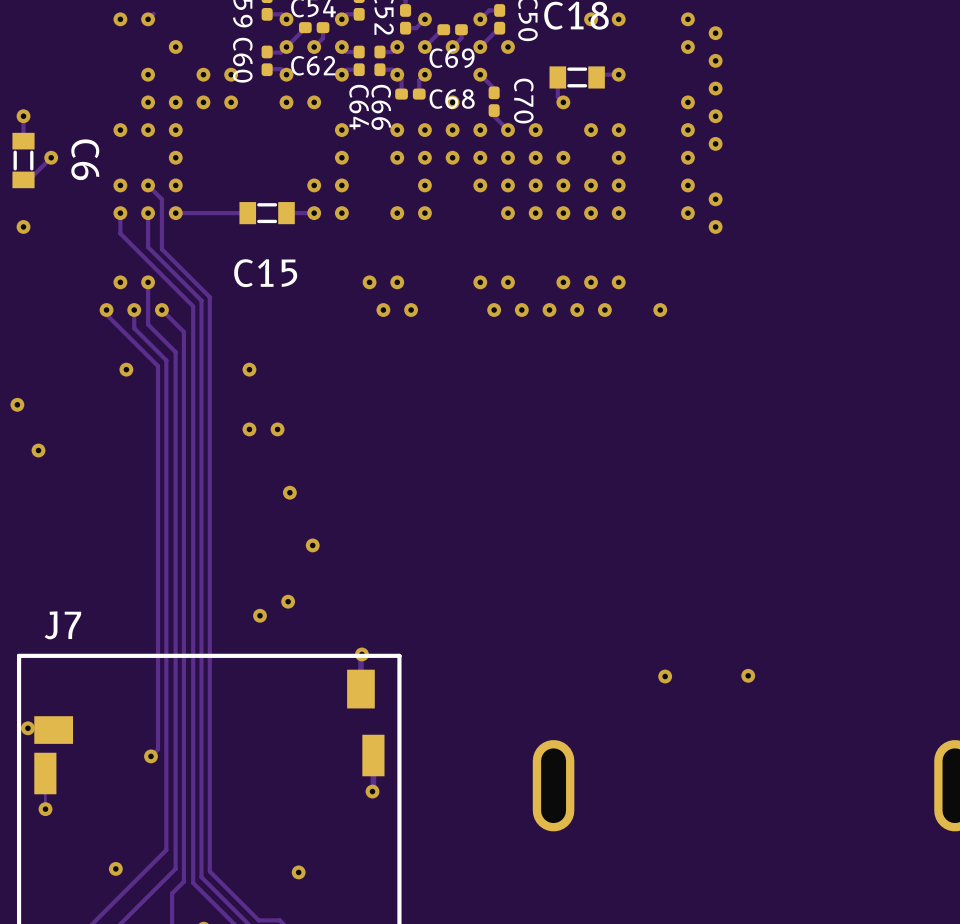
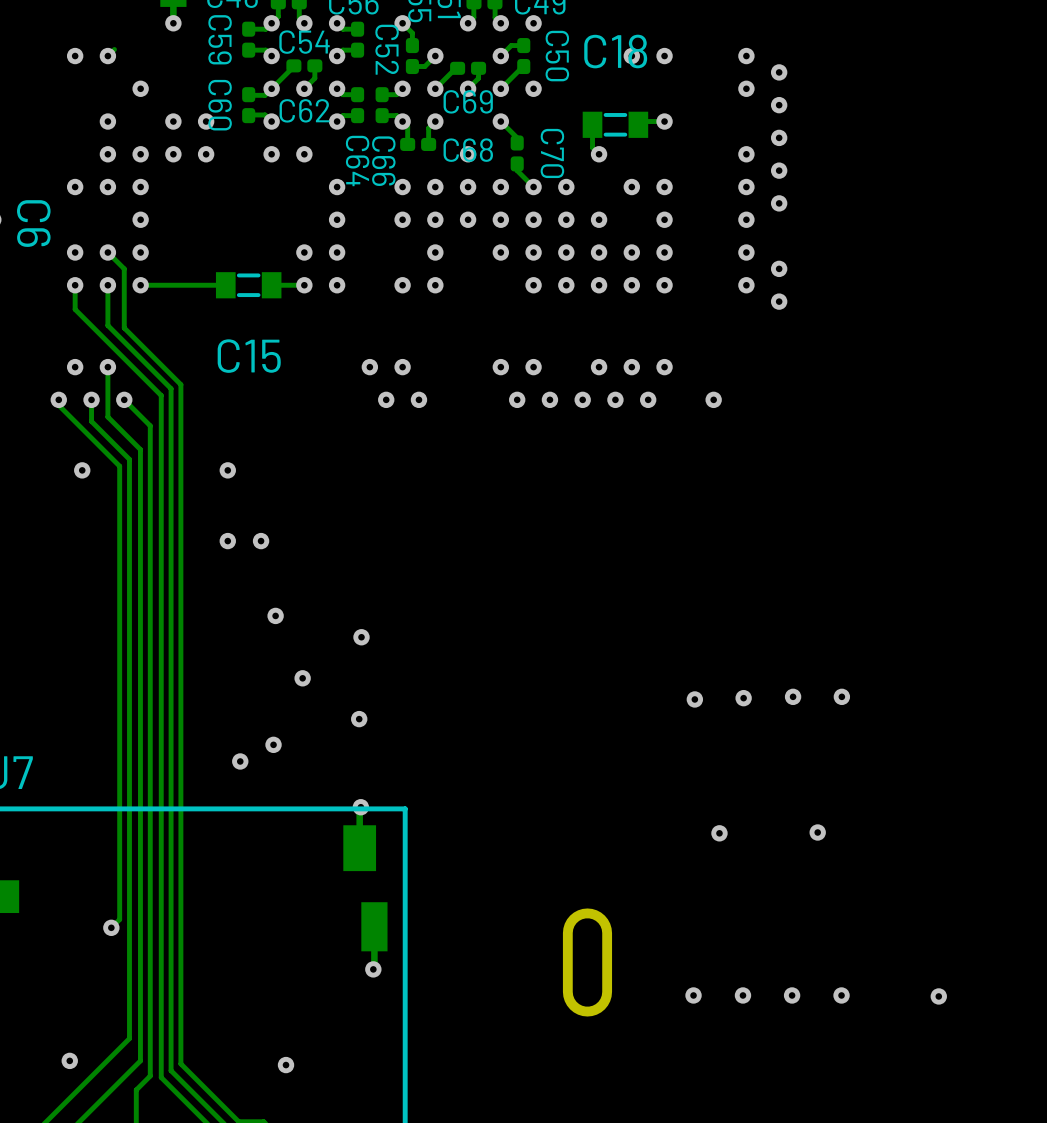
via: none -> (361, 637)
via: none -> (793, 696)
via: none -> (841, 696)
via: none -> (743, 698)
via: none -> (694, 699)
via: none -> (359, 719)
via: none -> (693, 995)
via: none -> (742, 995)
via: none -> (792, 995)
via: none -> (841, 995)
via: none -> (938, 996)

